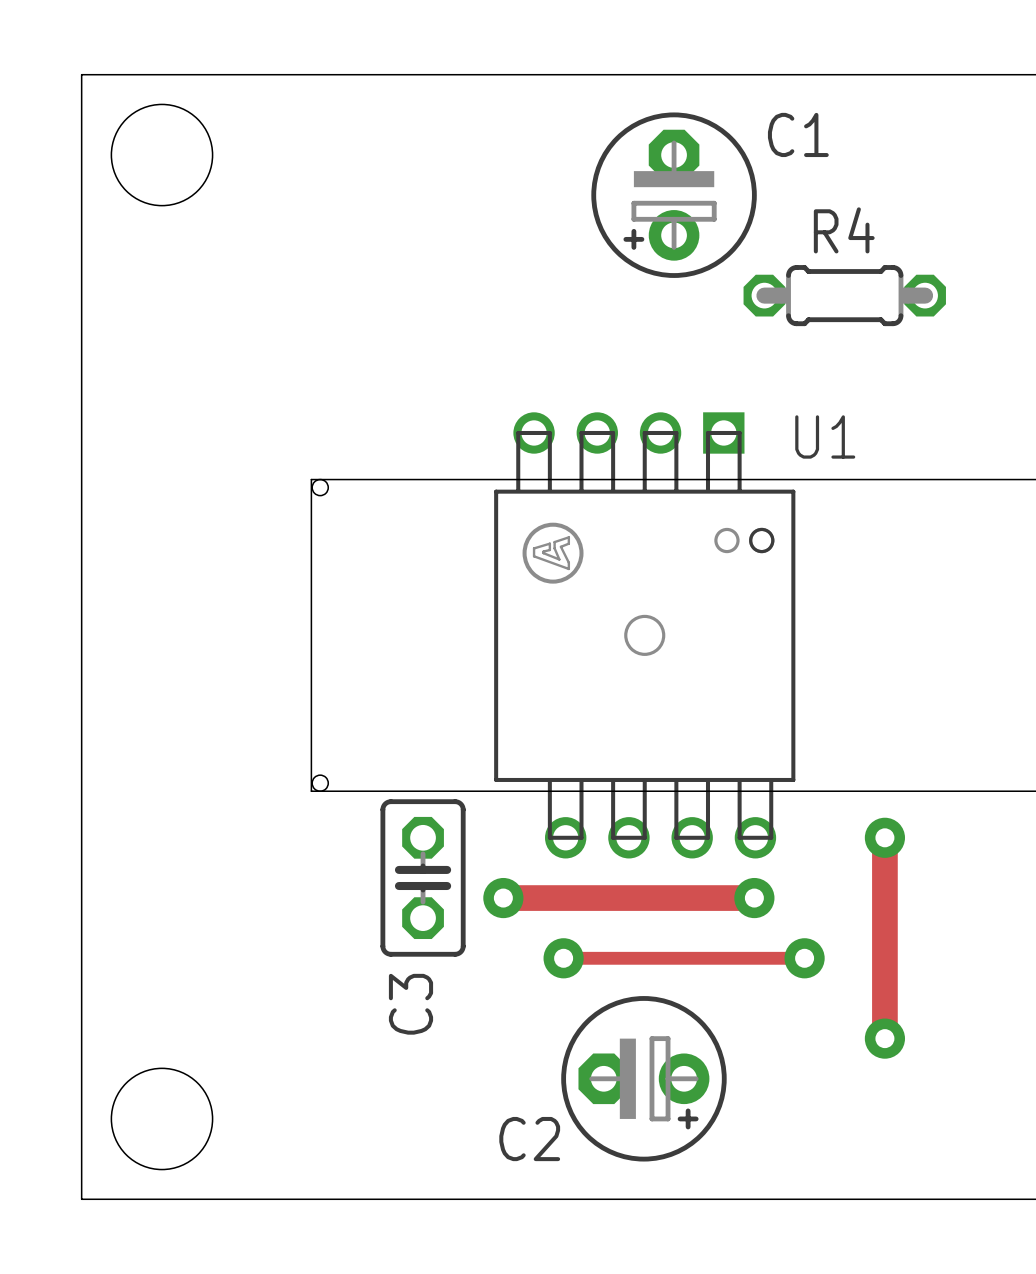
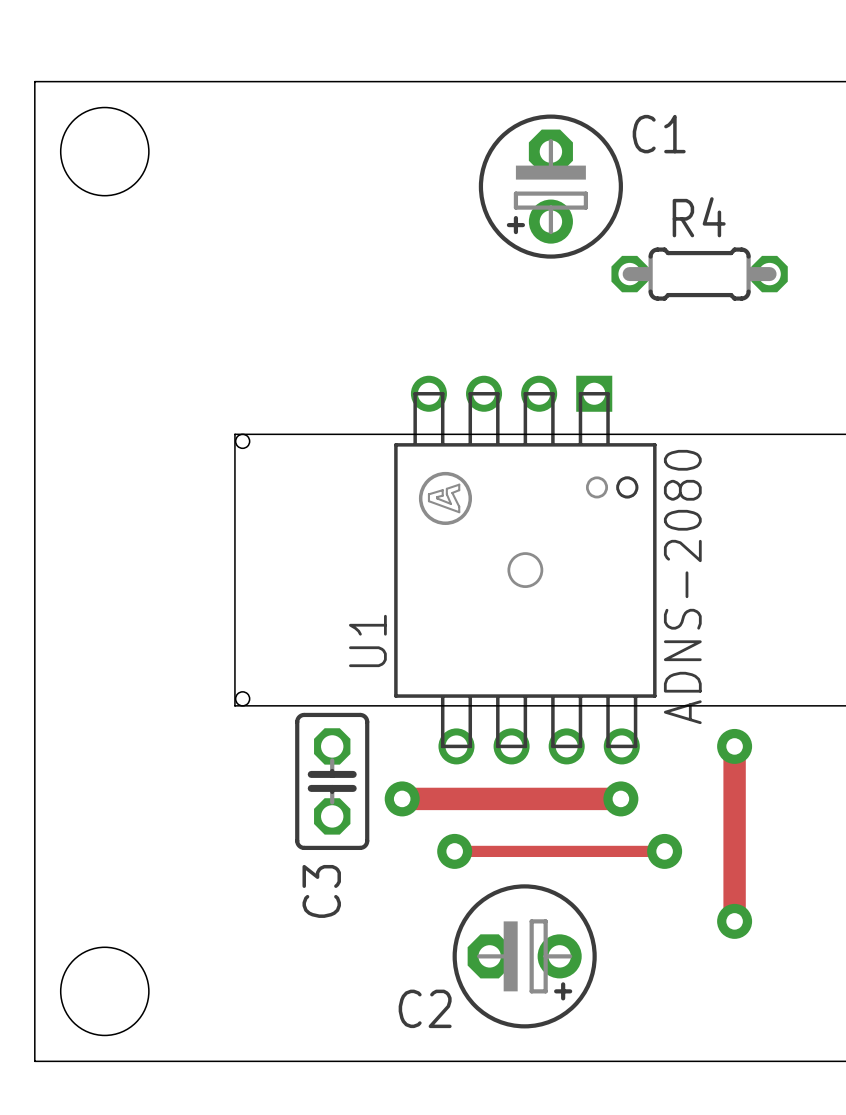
U1 name rotation: 0° (825, 436) -> 90° counterclockwise (367, 640)
U1 name position: U1 (825, 436) -> U1 (367, 640)
U1 value: none -> ADNS-2080 (682, 586)

